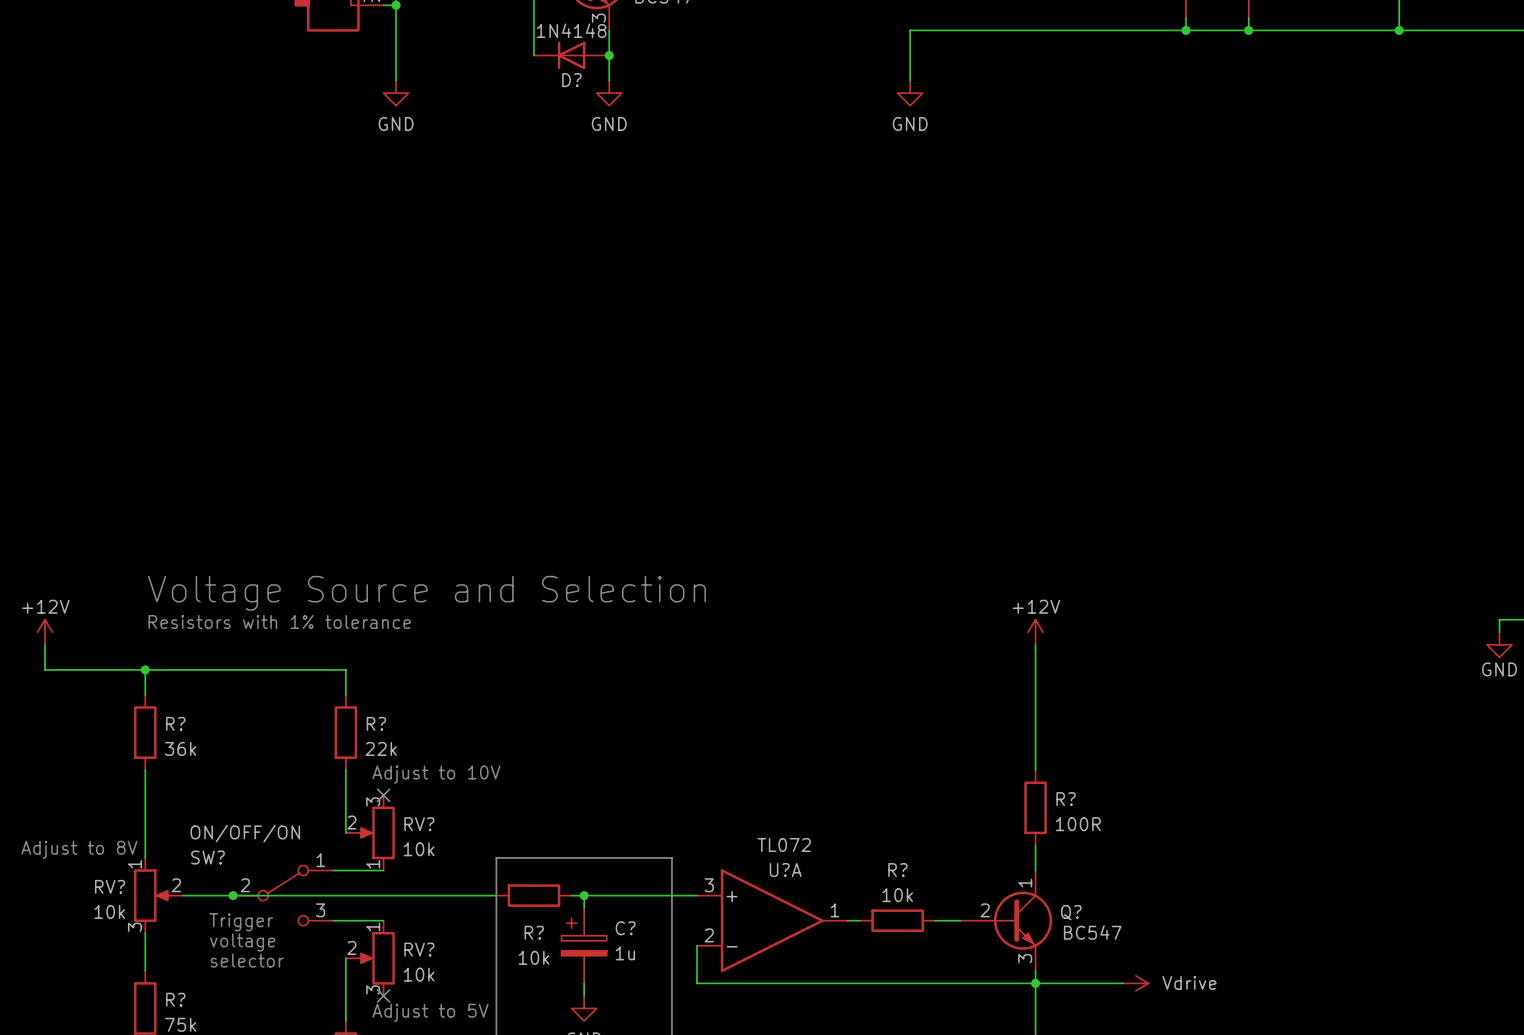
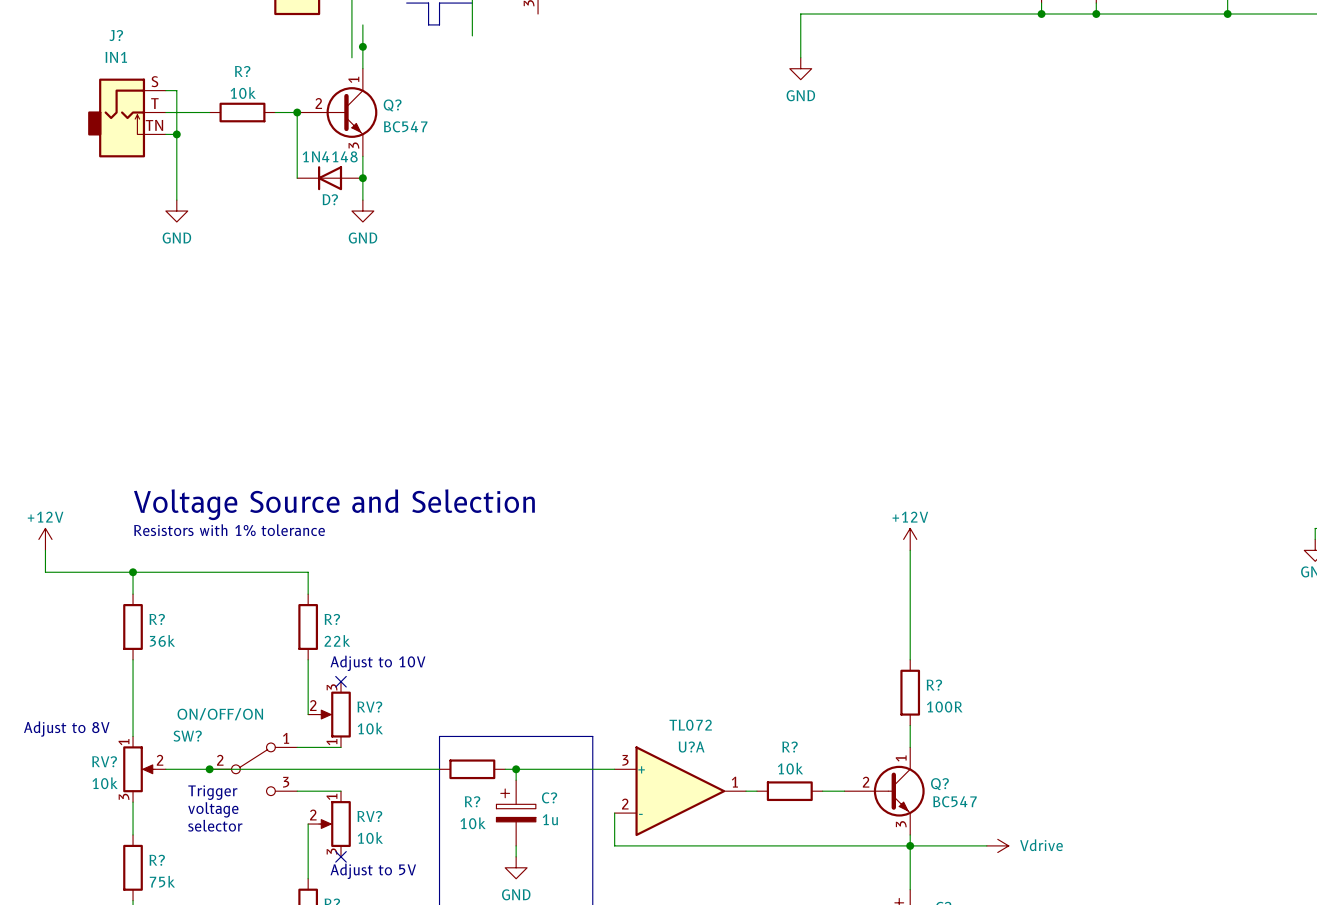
line: none -> (406, 3) (428, 3) (428, 24) (439, 24) (439, 3) (472, 3)
wire: (609, 30) (609, 80) -> (362, 24) (362, 68)
D?: 1N4148 (571, 55) -> none
junction: (609, 55) -> none
junction: none -> (362, 46)
power symbol: GND (396, 93) -> none
power symbol: GND (609, 93) -> none
wire: none -> (165, 90) (176, 90) (176, 200)
wire: none -> (165, 112) (209, 112)
R?: none -> 10k (242, 112)
wire: none -> (275, 112) (297, 112) (297, 178)
junction: none -> (297, 112)
Q?: none -> BC547 (337, 112)
J?: none -> IN1 (127, 117)
wire: none -> (165, 134) (176, 134)
junction: none -> (176, 134)
wire: none -> (362, 156) (362, 200)
D?: none -> 1N4148 (330, 178)
junction: none -> (362, 178)
power symbol: none -> GND (176, 211)
power symbol: none -> GND (362, 211)

